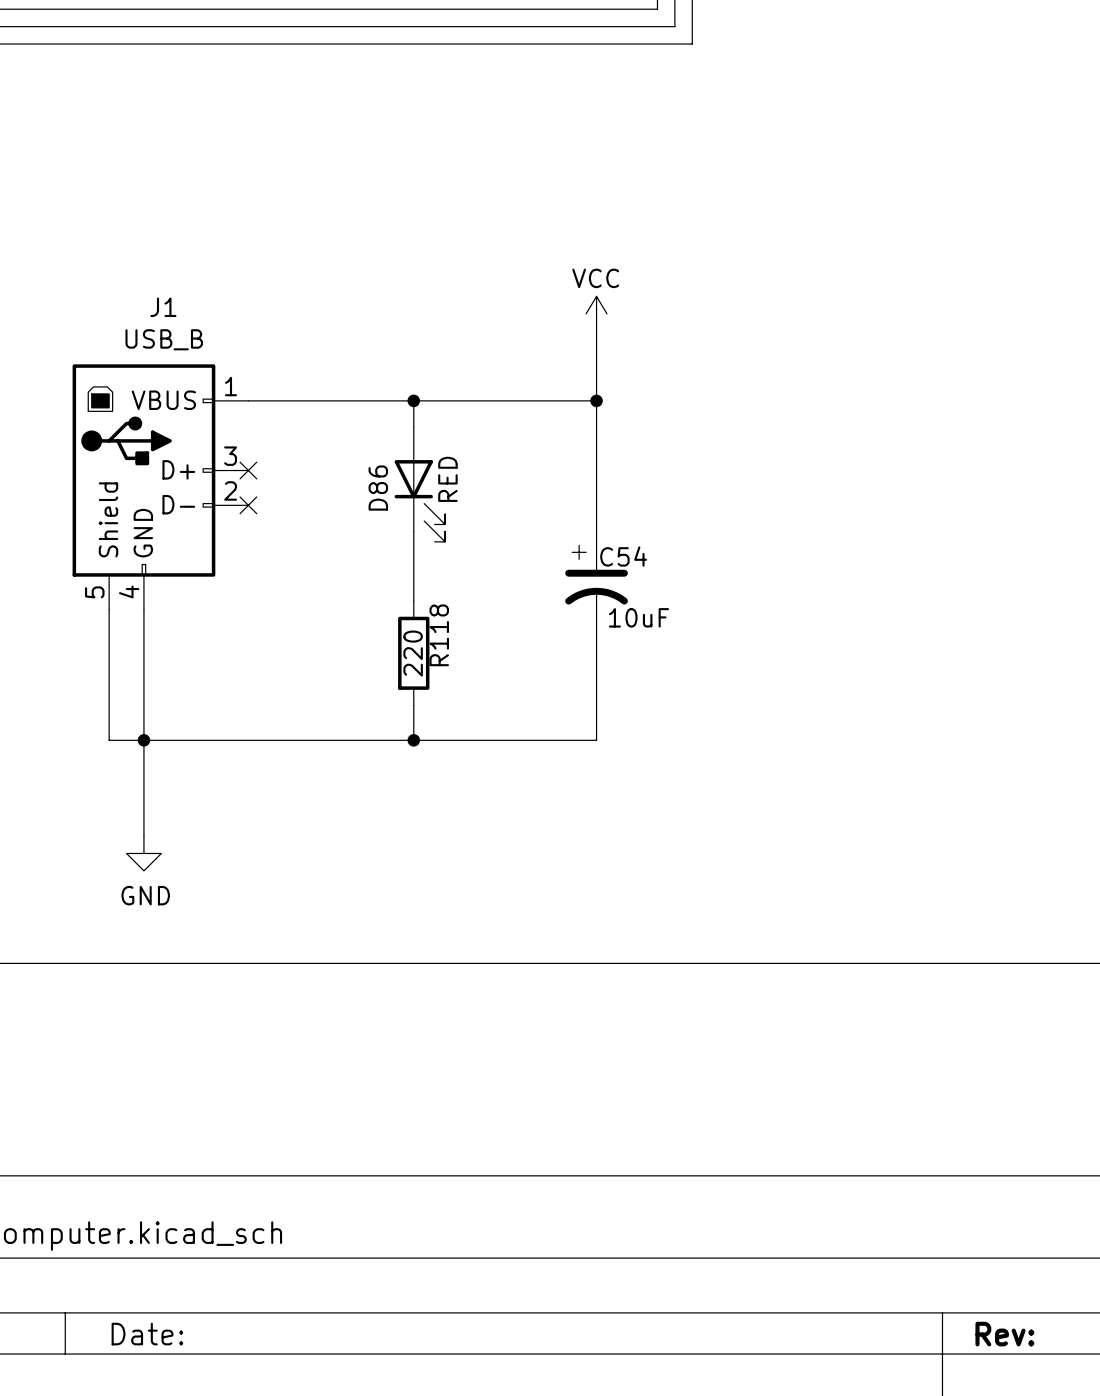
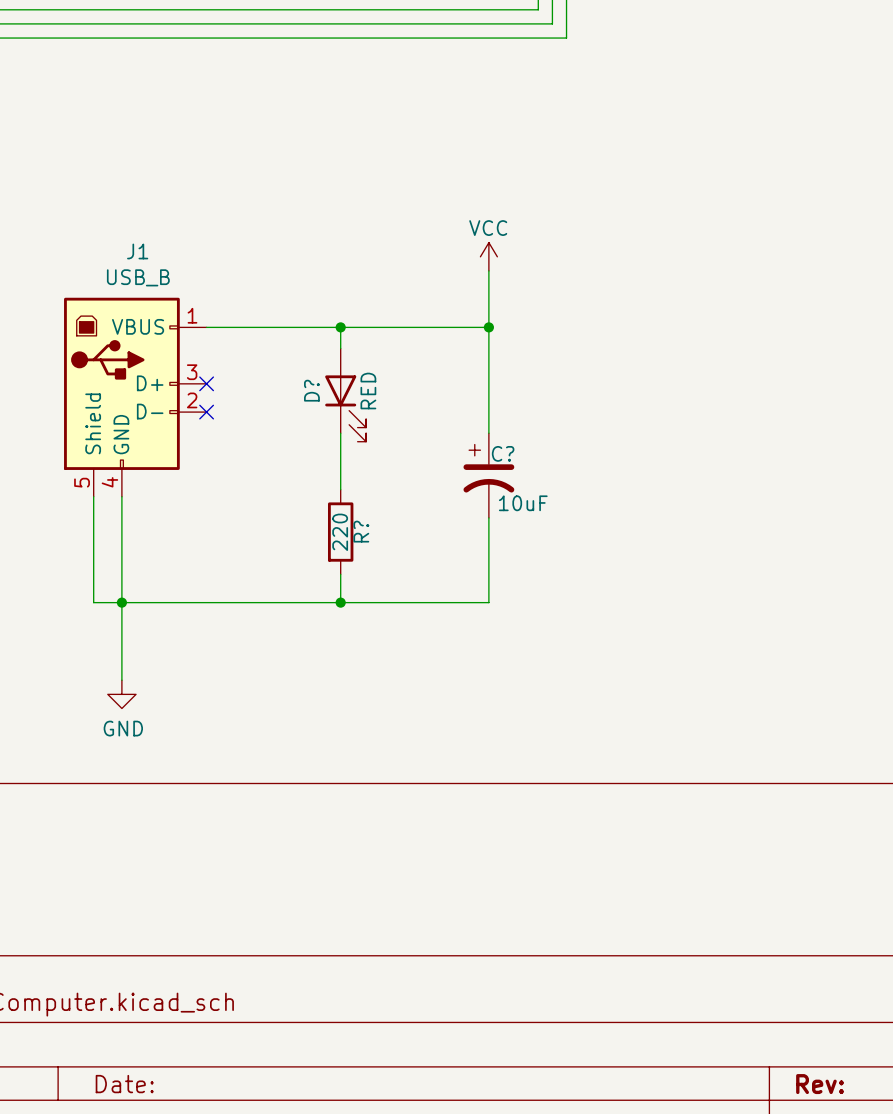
D86 name: D86 (378, 488) -> D? (311, 390)
C54 name: C54 (623, 556) -> C? (503, 453)
R118 name: R118 (439, 635) -> R? (361, 531)

